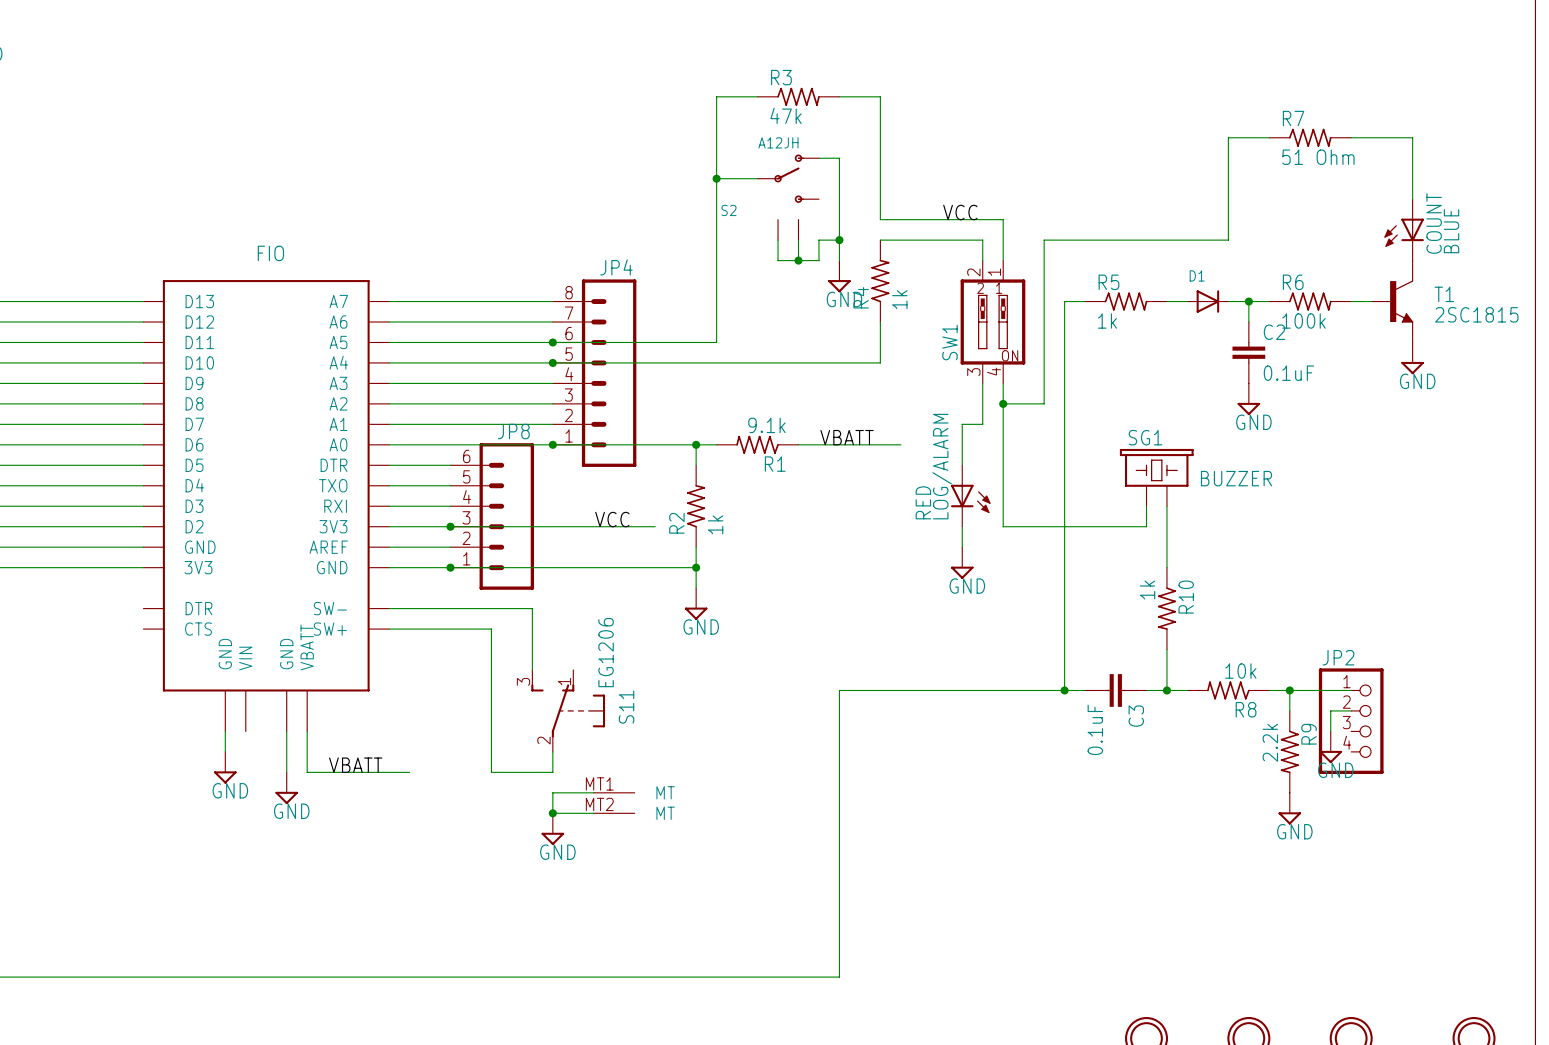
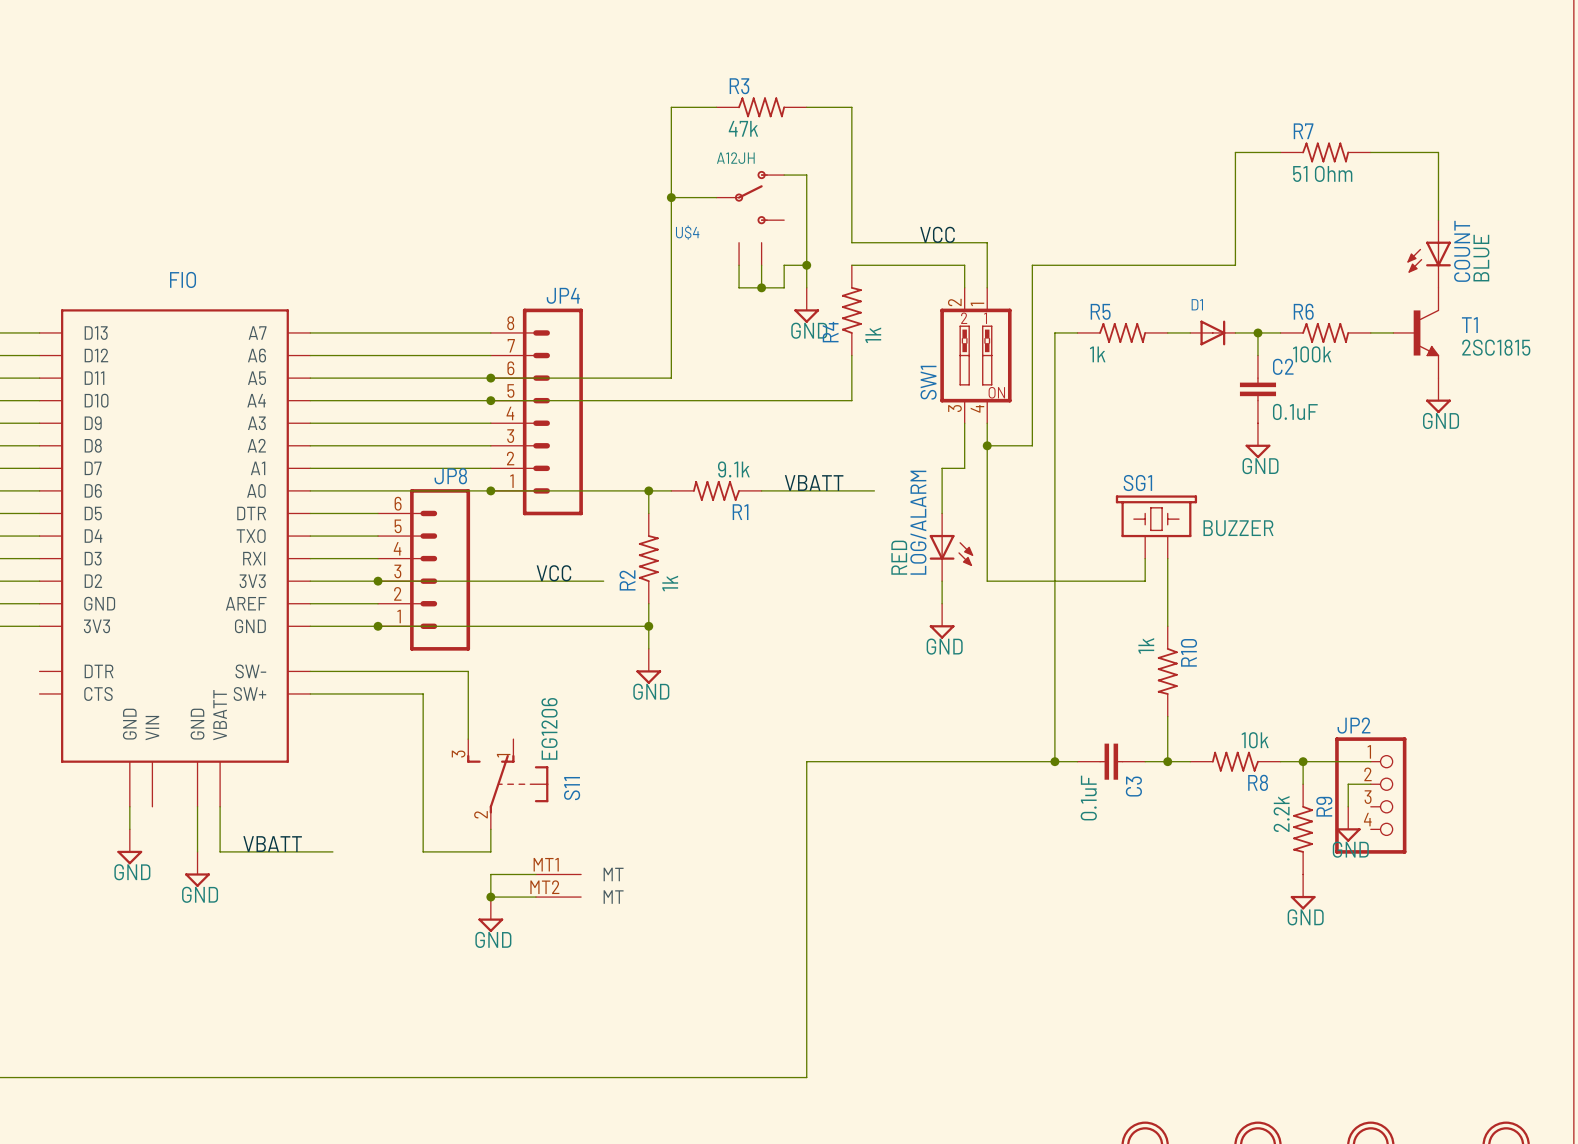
S2 name: S2 (728, 210) -> U$4 (687, 232)

